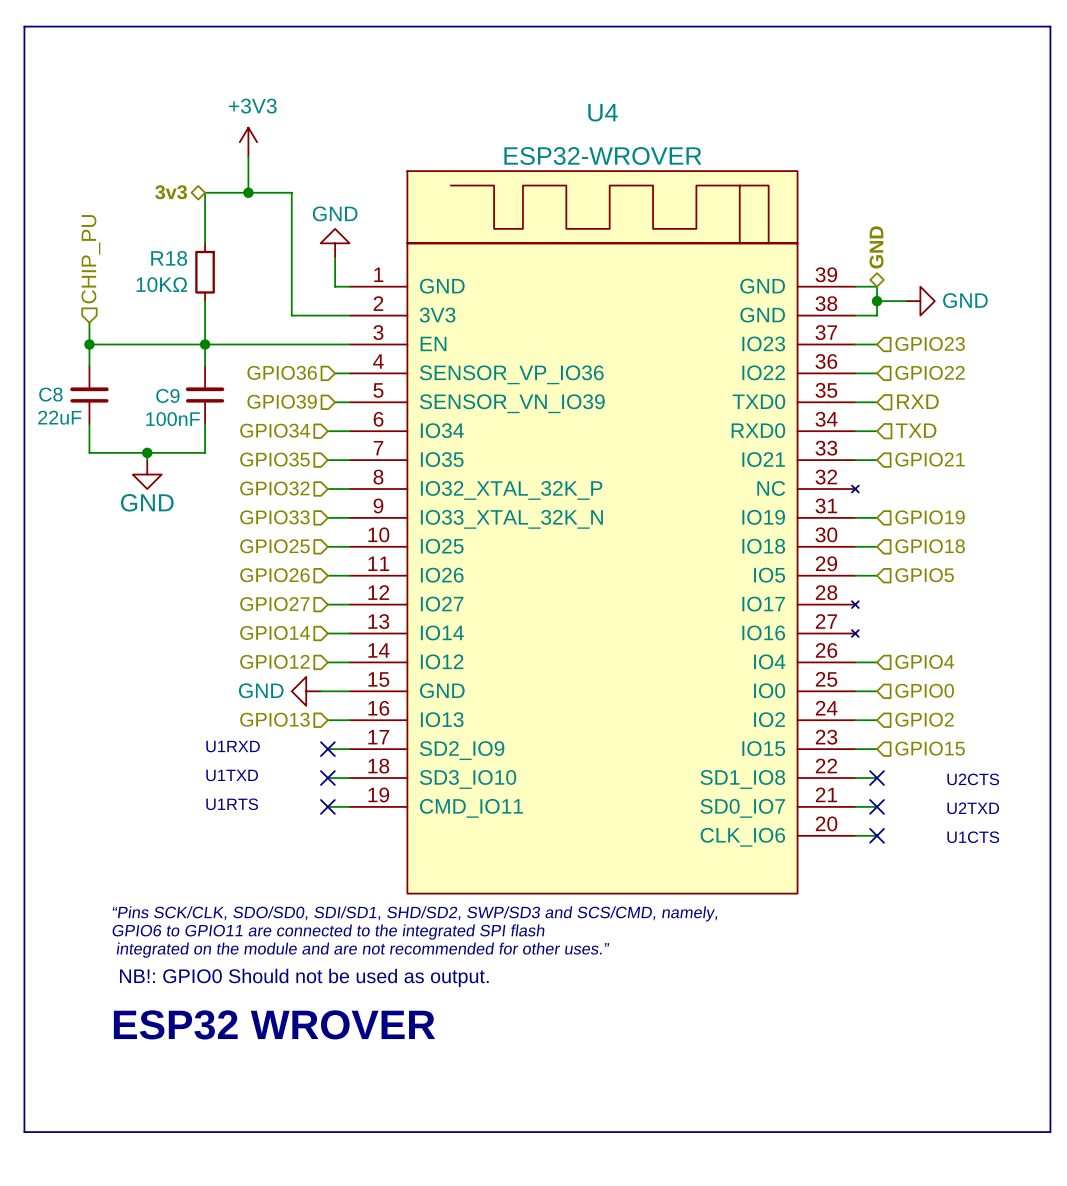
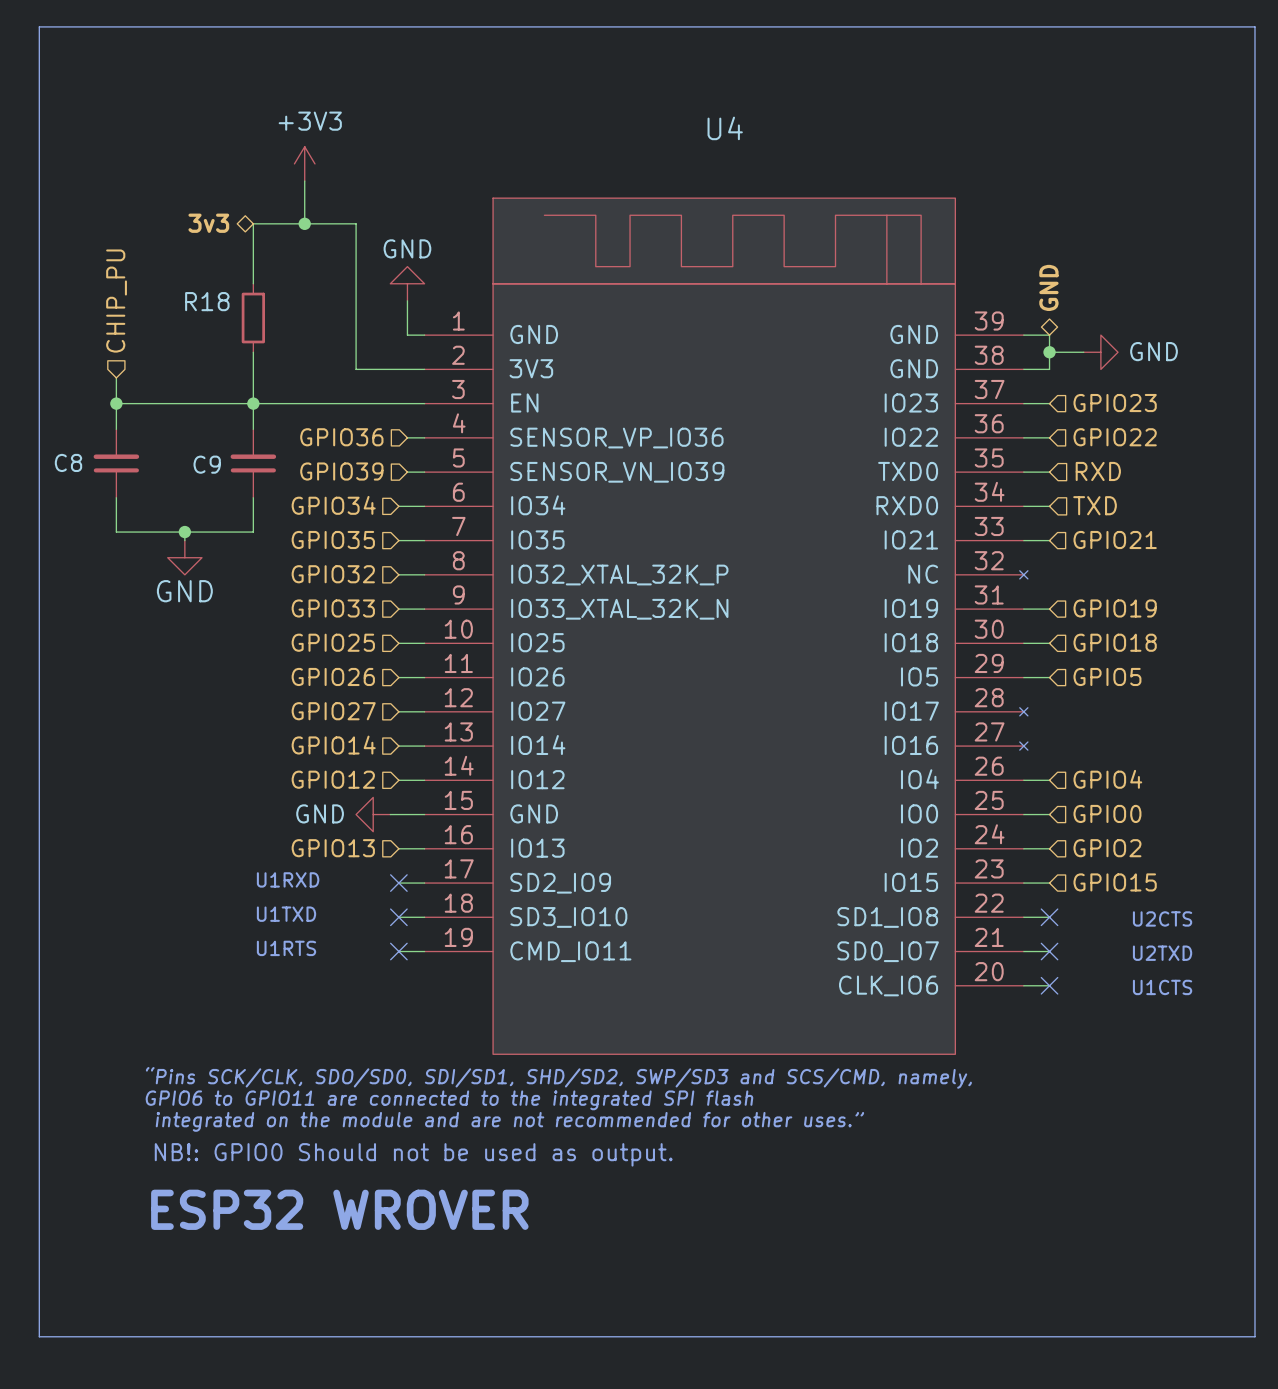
U4 value: ESP32-WROVER (602, 155) -> none
R18 value: 10KΩ (161, 284) -> none
C8 value: 22uF (59, 417) -> none
C9 value: 100nF (173, 419) -> none

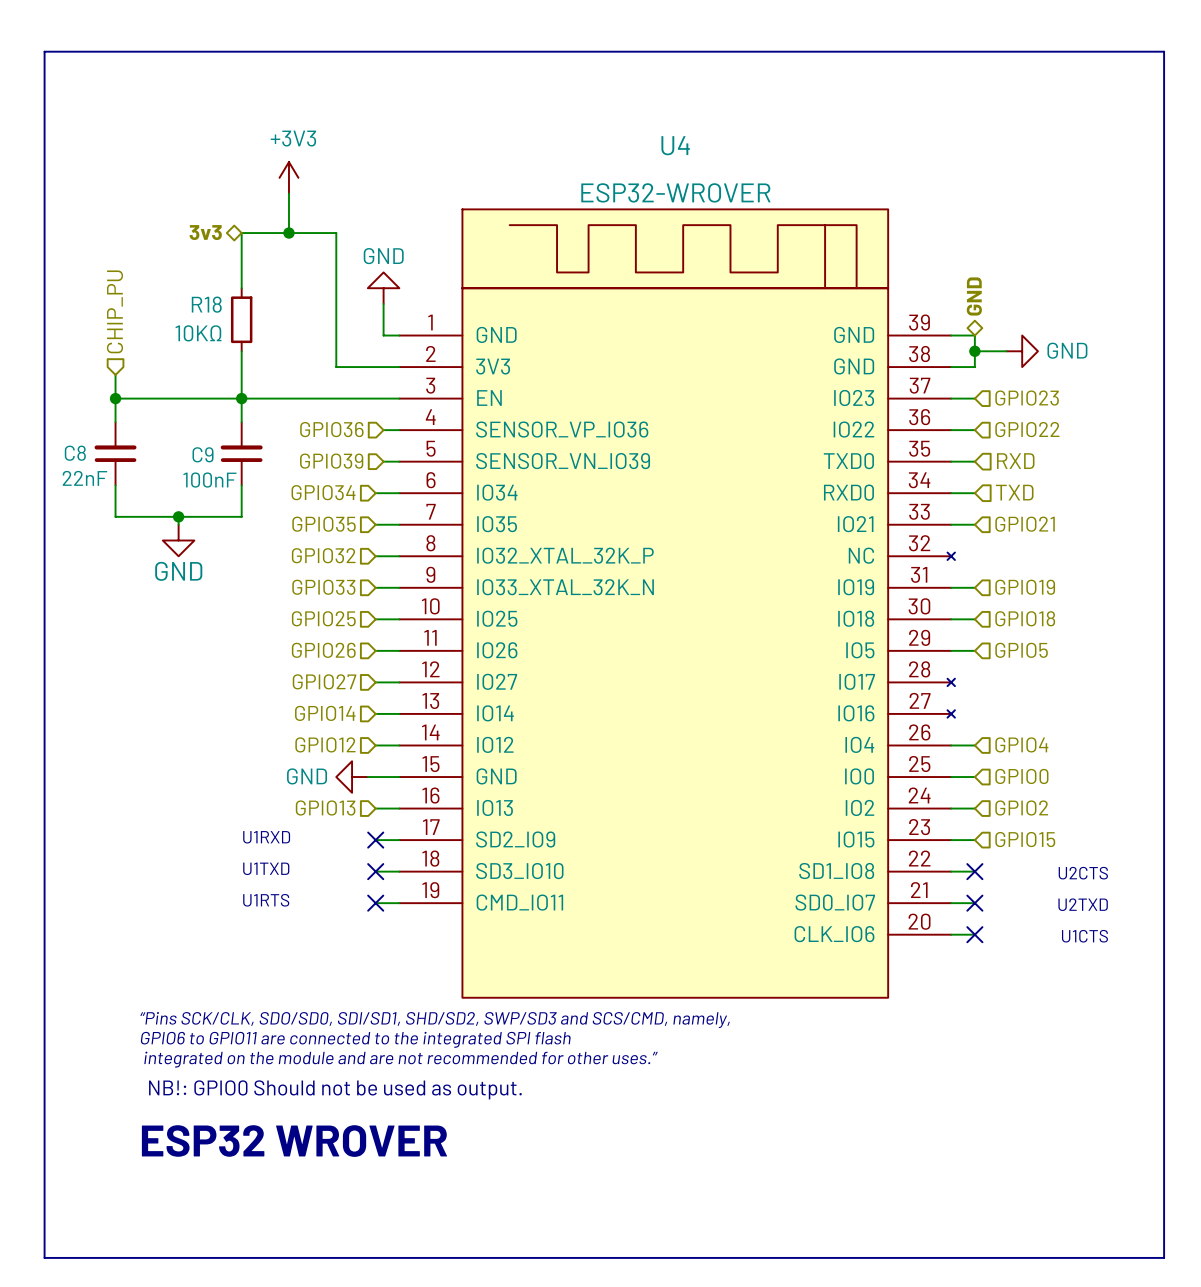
U4 value: none -> ESP32-WROVER (675, 192)
R18 value: none -> 10KΩ (198, 333)
C8 value: none -> 22nF (84, 478)
C9 value: none -> 100nF (209, 480)

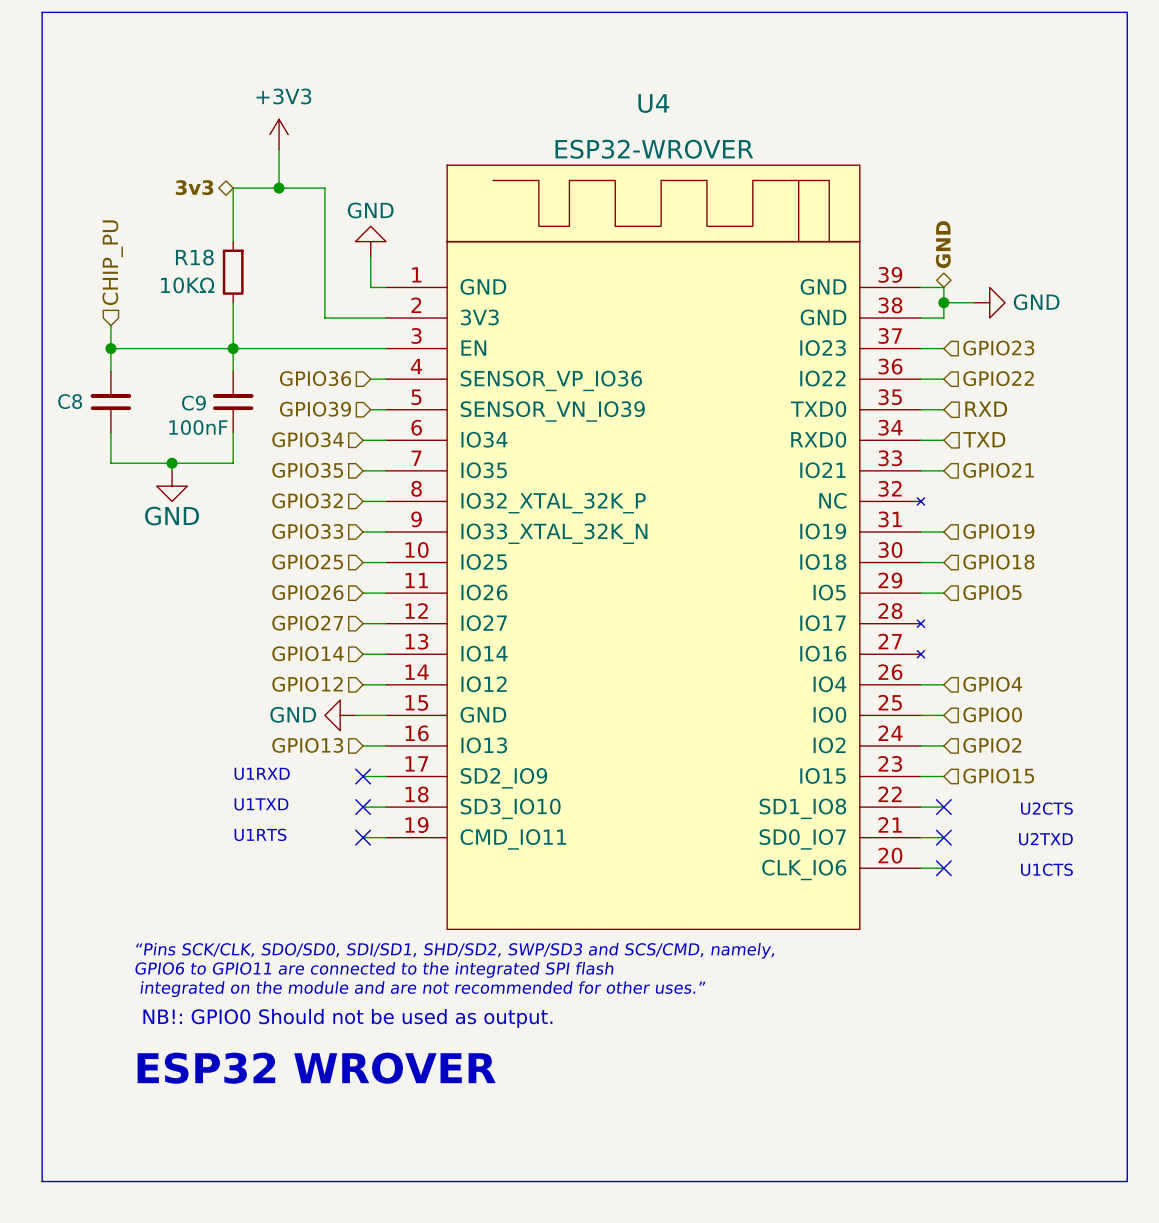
C8 value: 22nF (84, 478) -> none

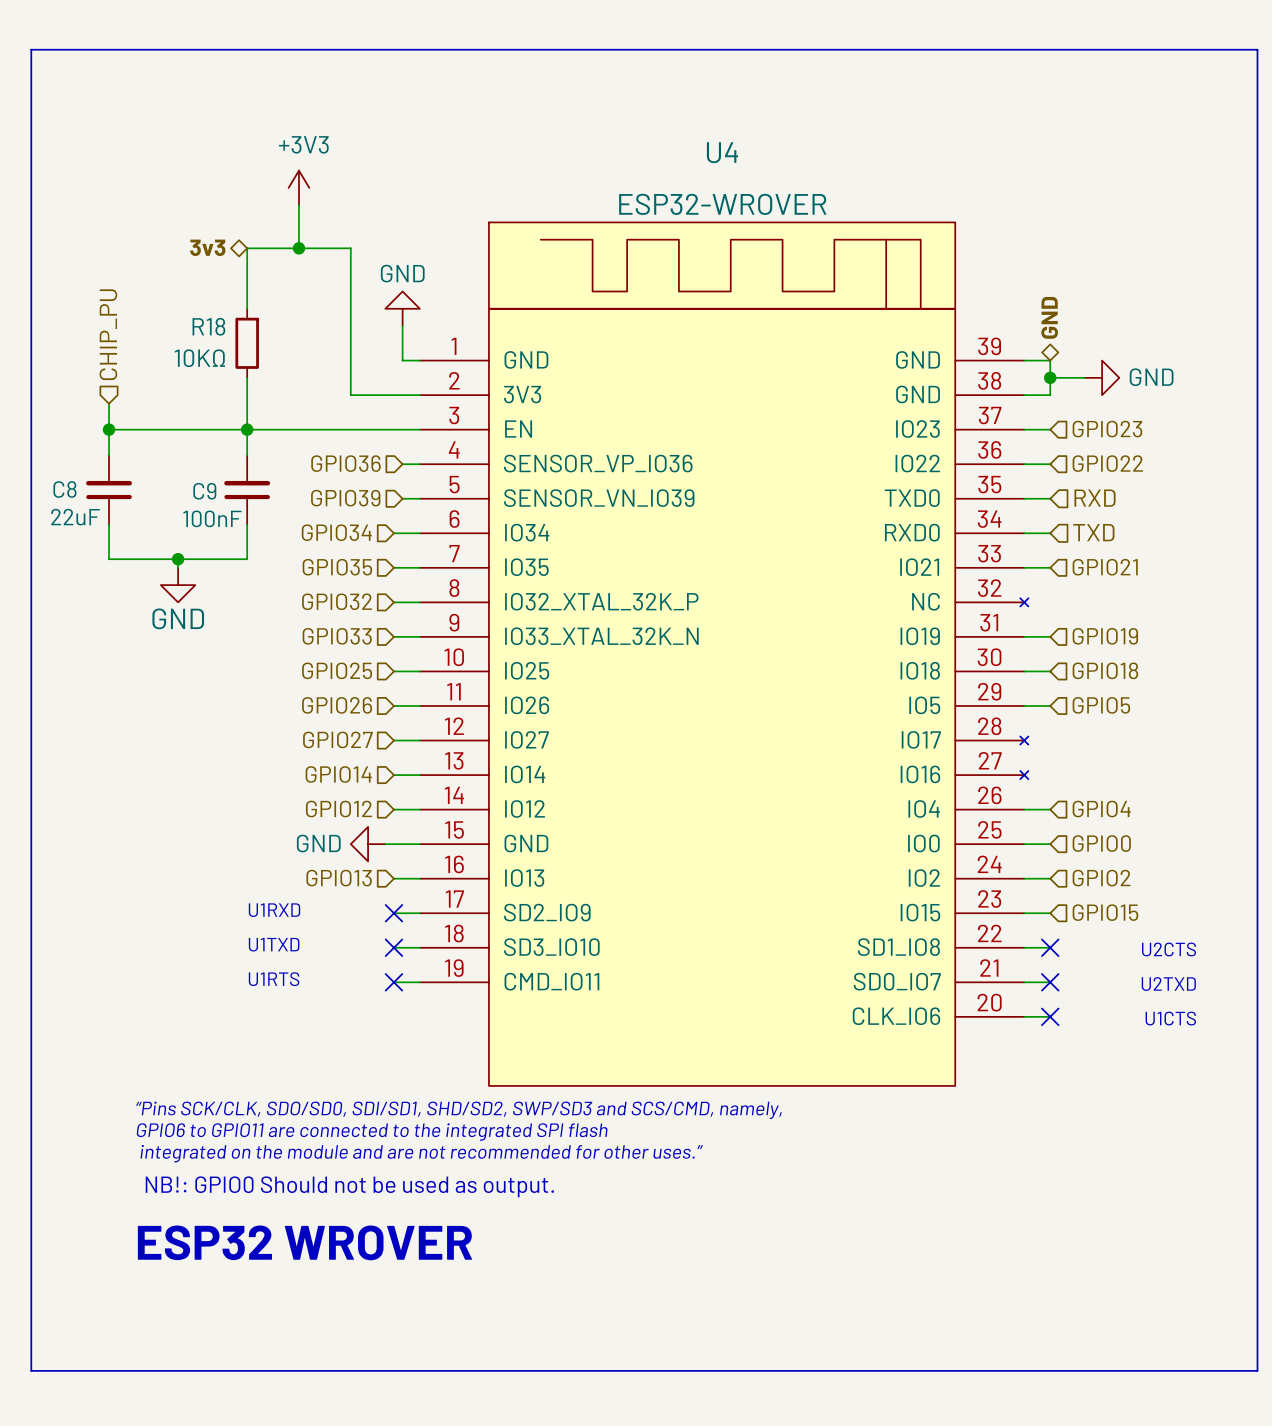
C8 value: none -> 22uF (75, 517)

